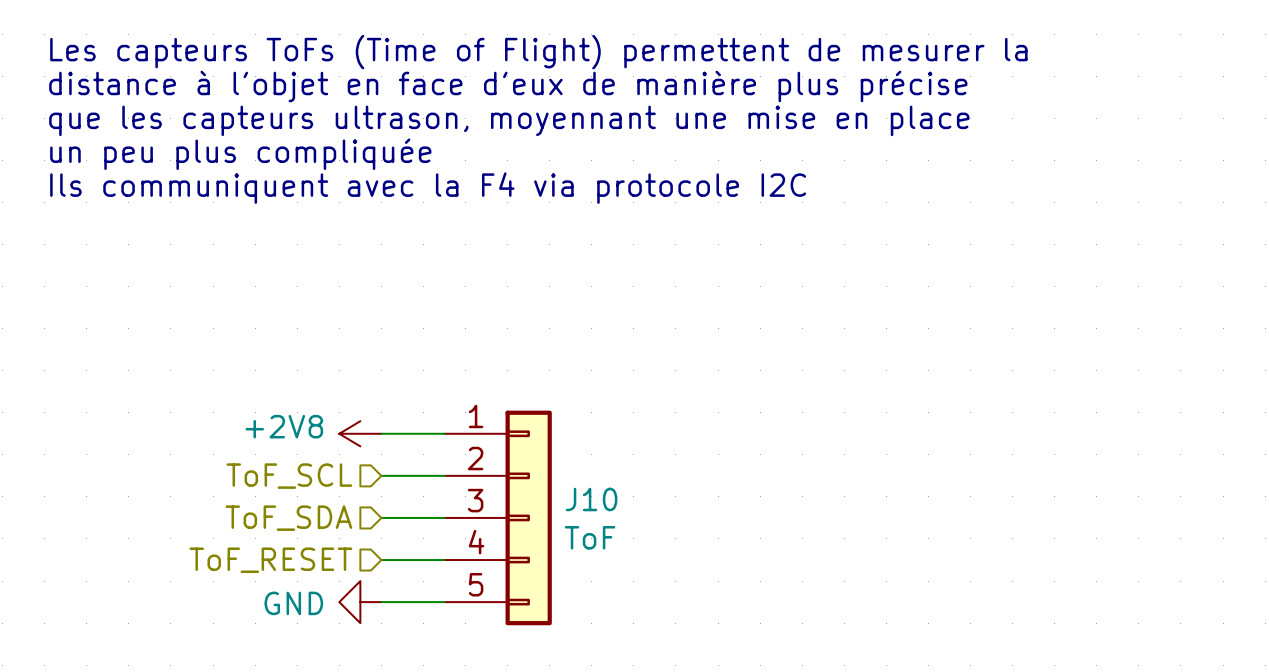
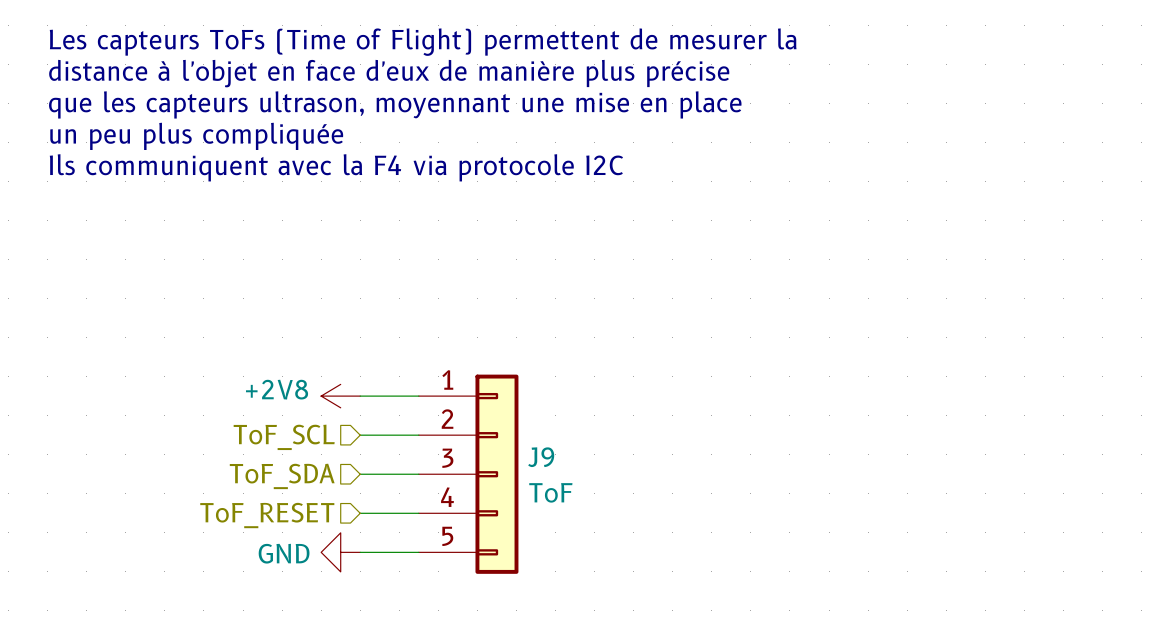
J10 name: J10 (591, 499) -> J9 (541, 457)

